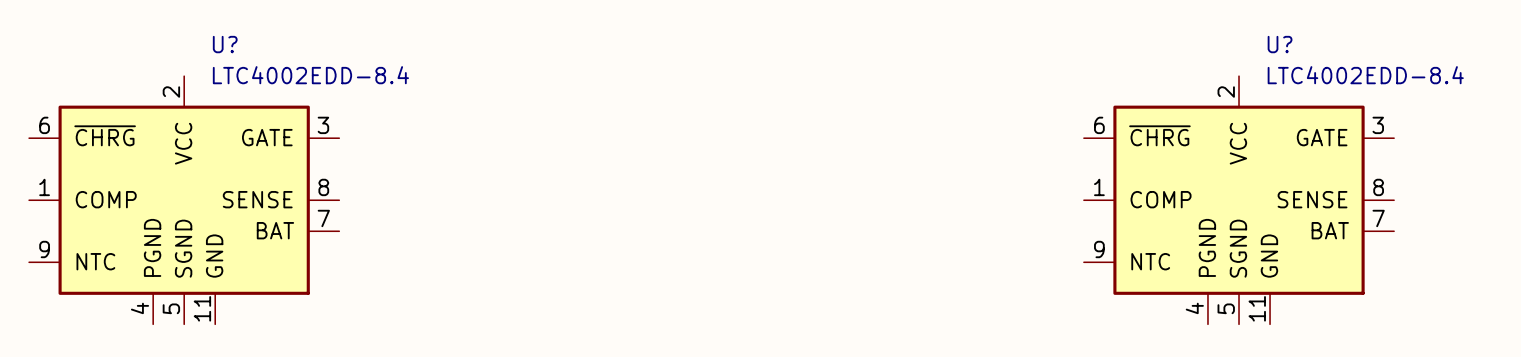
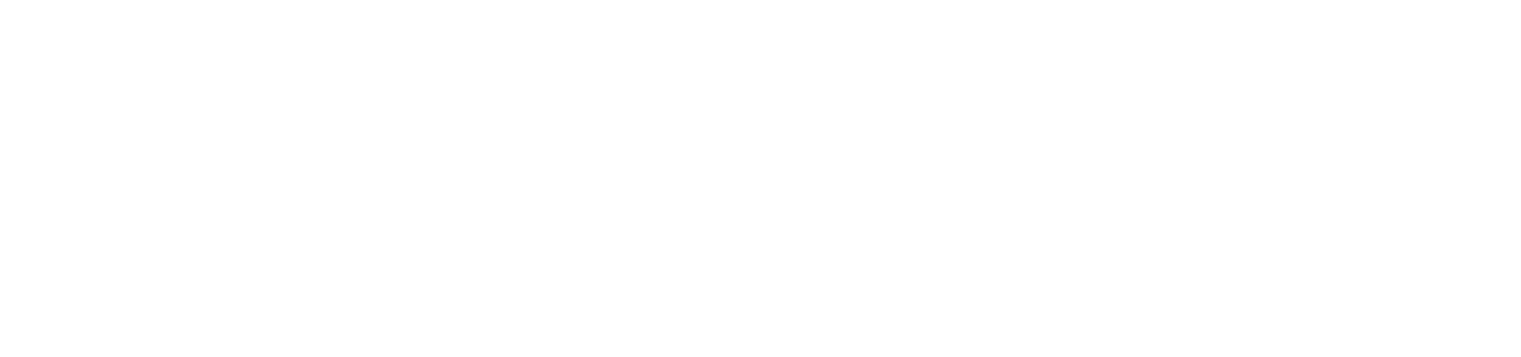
U?: LTC4002EDD-8.4 (184, 200) -> none
U?: LTC4002EDD-8.4 (1239, 200) -> none

